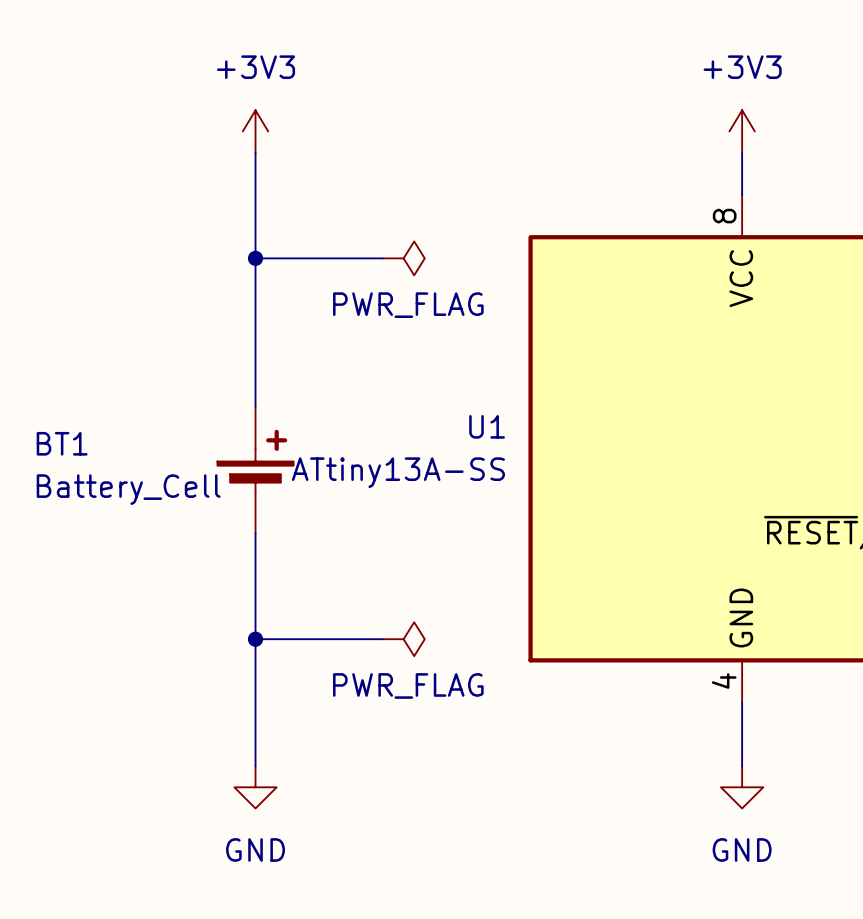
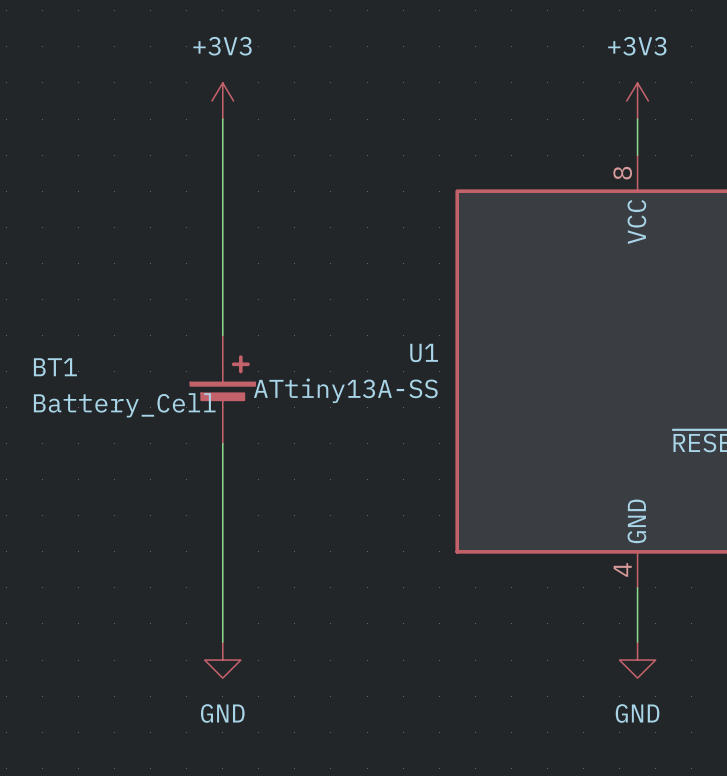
wire: (255, 258) (382, 258) -> none
junction: (255, 258) -> none
power symbol: PWR_FLAG (403, 258) -> none
wire: (255, 639) (382, 639) -> none
junction: (255, 639) -> none
power symbol: PWR_FLAG (403, 639) -> none

